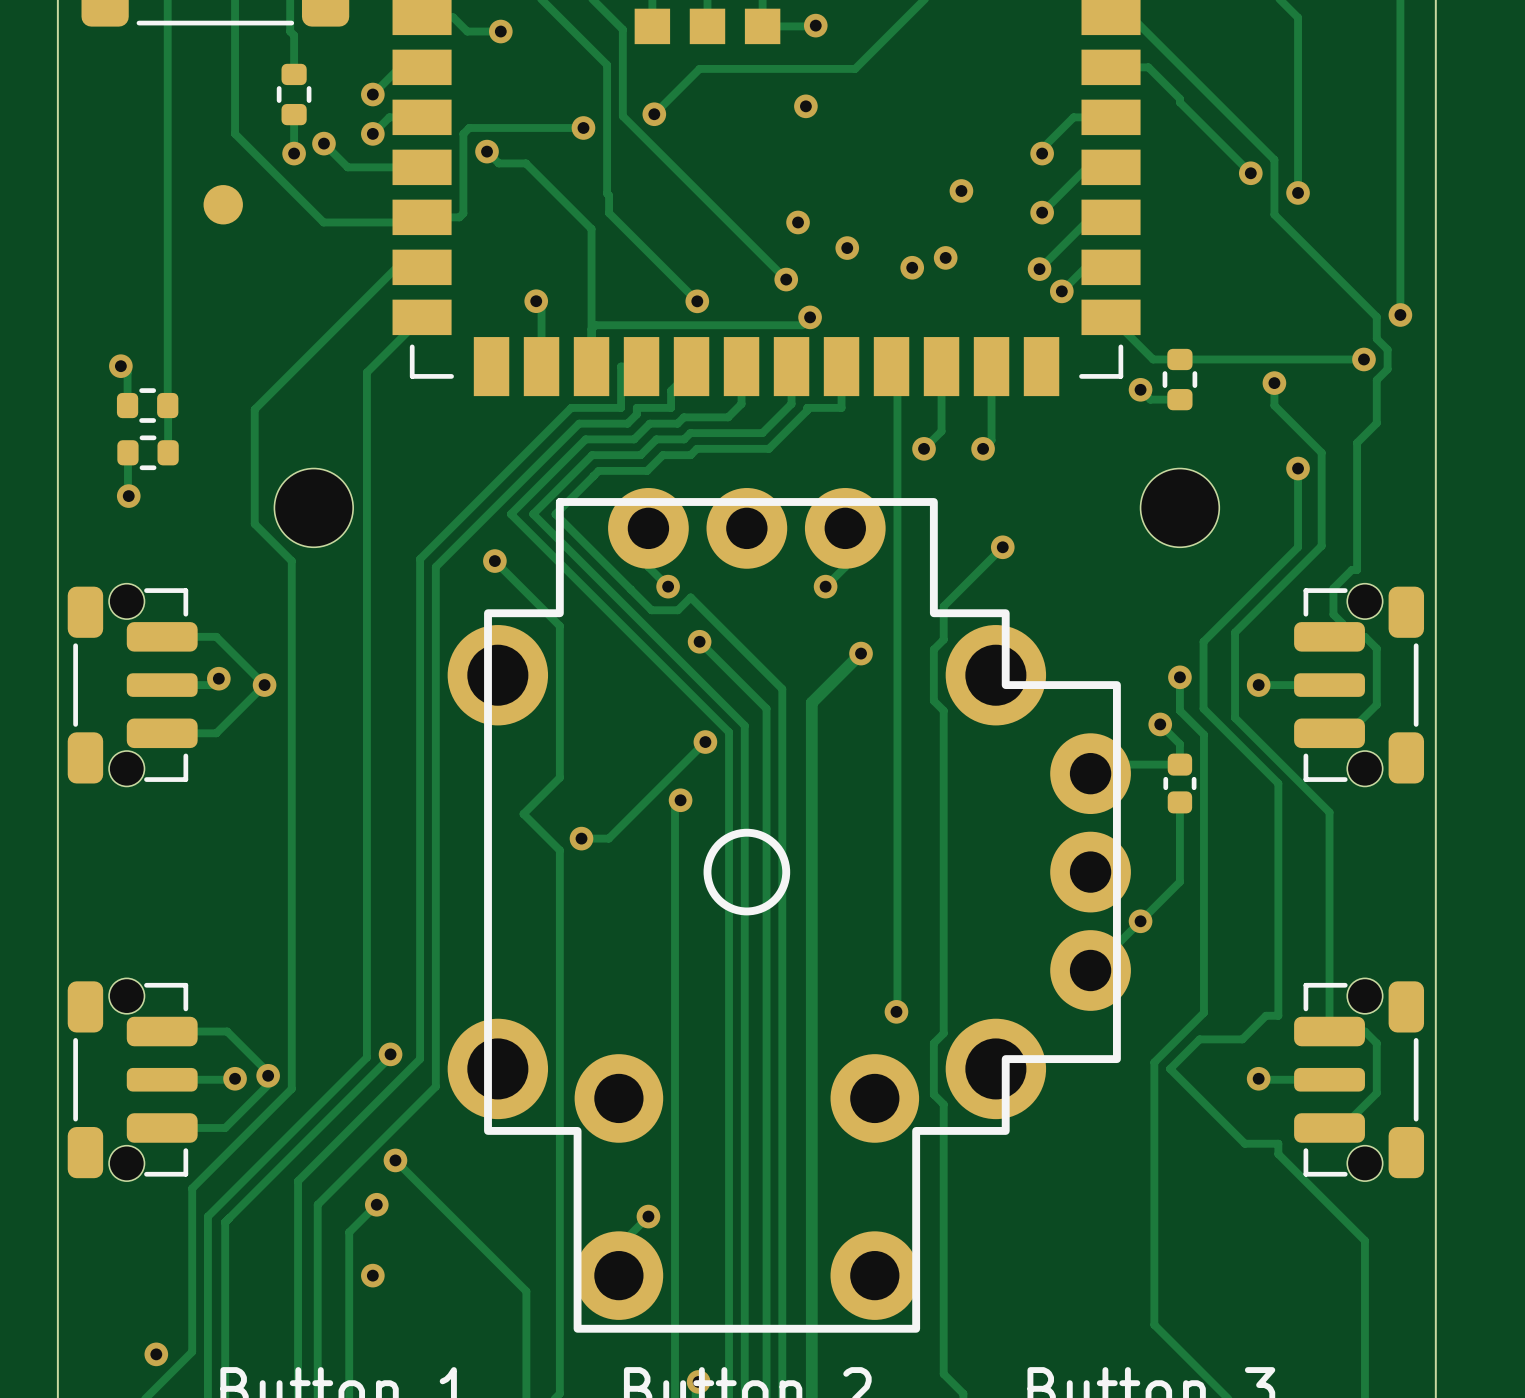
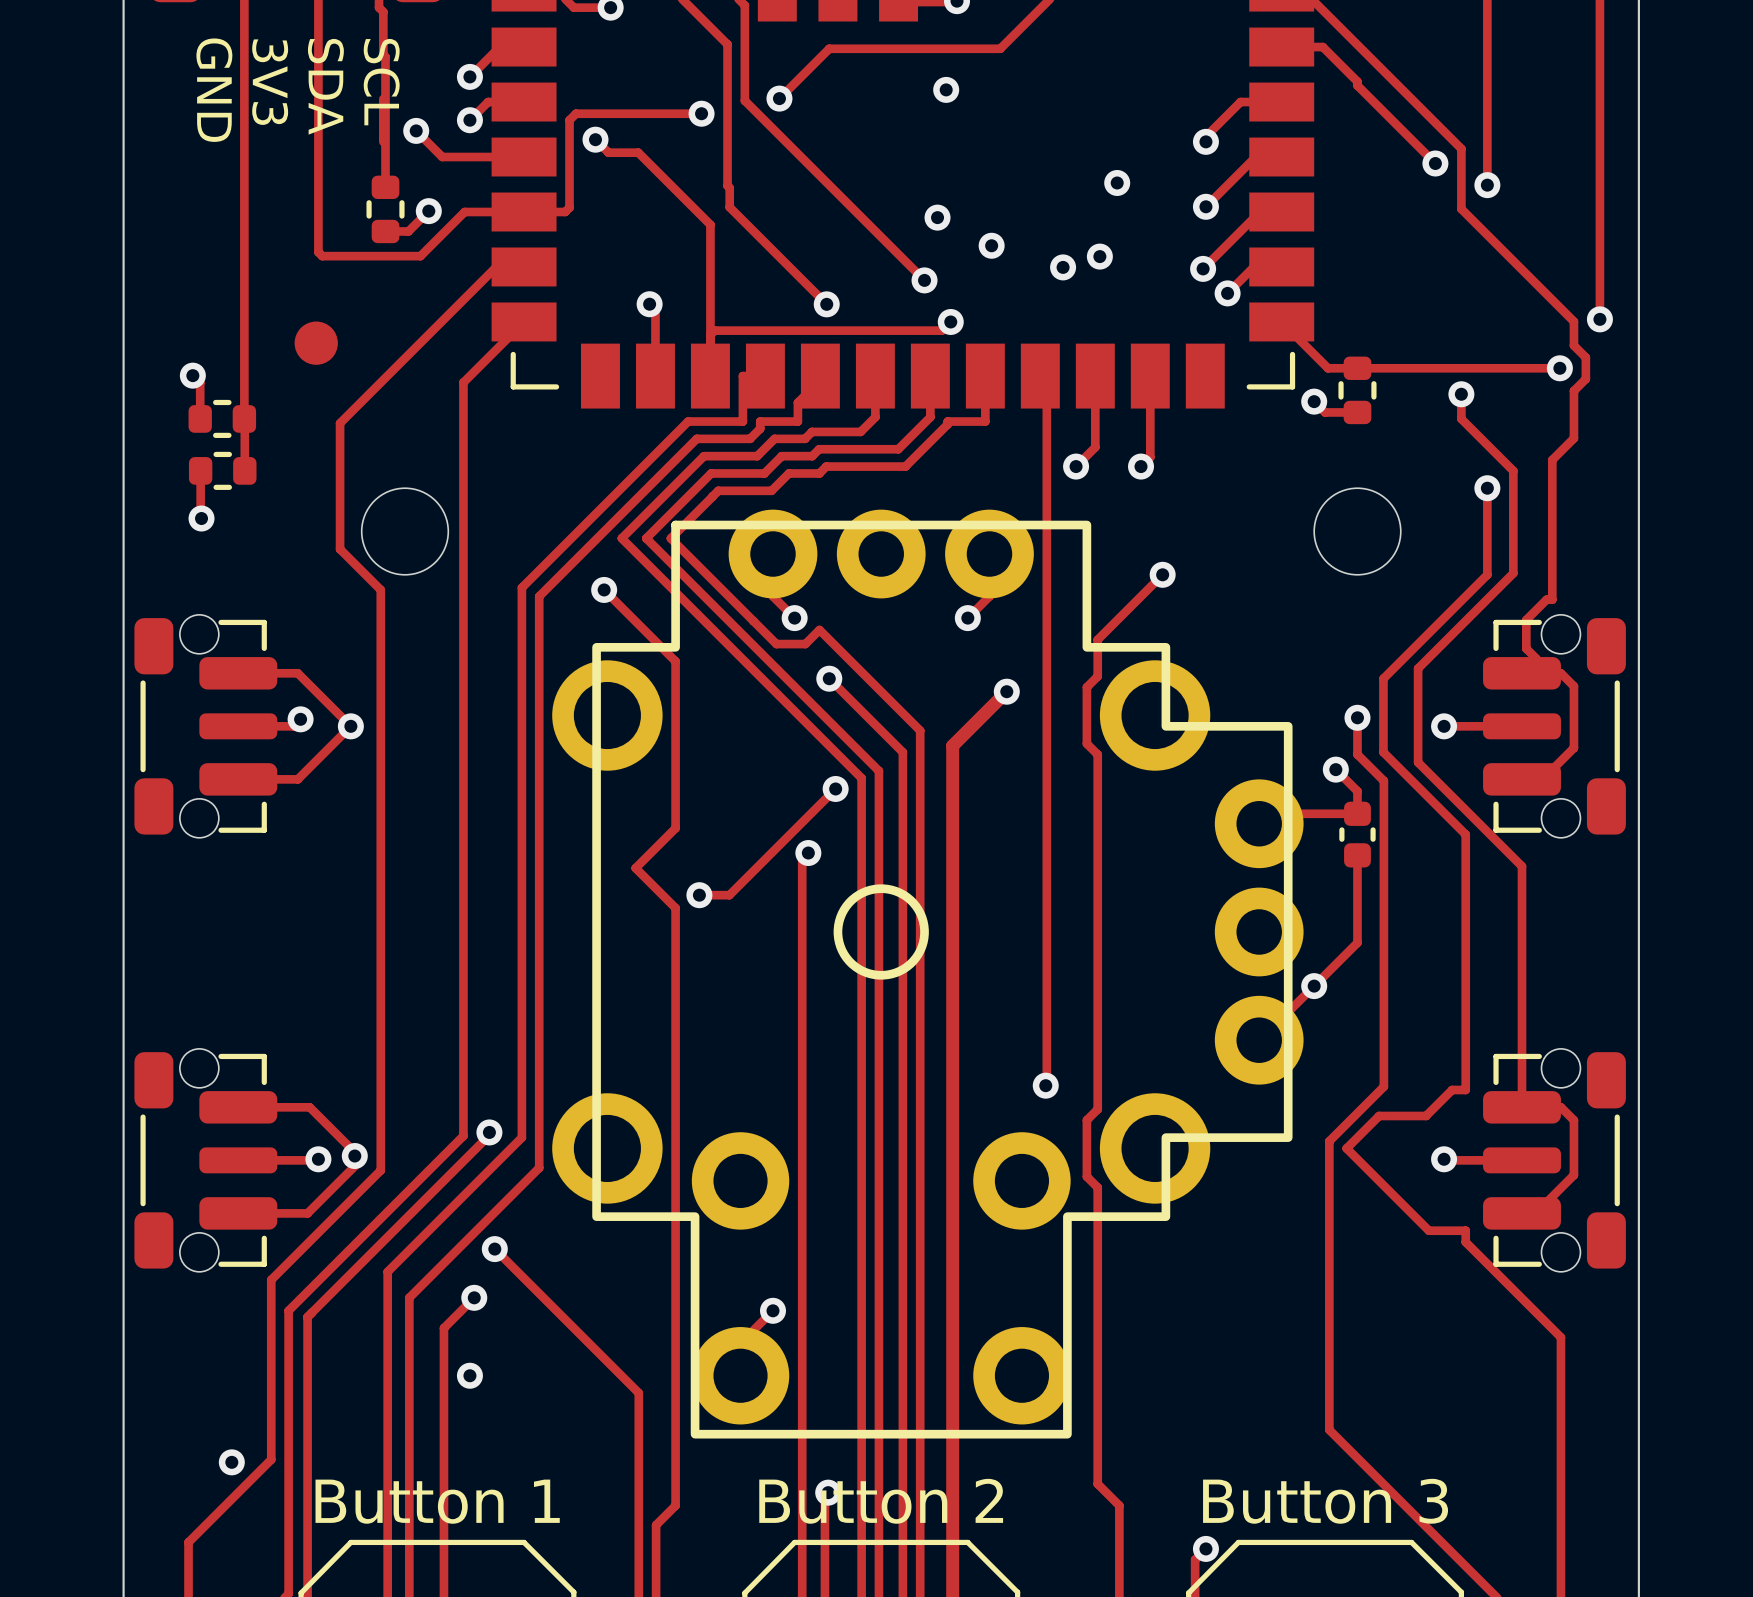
track: none -> (383, 54) (385, 57) (385, 187)
part position: (294, 94) -> (385, 209)
text: none -> 3V3 (270, 82)
text: none -> SCL (381, 82)
text: none -> SDA (325, 86)
text: none -> GND (214, 90)
track: (235, 133) (323, 222) (416, 222) (422, 217) -> (318, 120) (318, 252) (322, 256) (420, 256) (464, 211) (524, 211)
via position: (294, 153) -> (428, 211)
part position: (223, 204) -> (316, 343)
track: none -> (428, 211) (408, 231) (385, 231)

